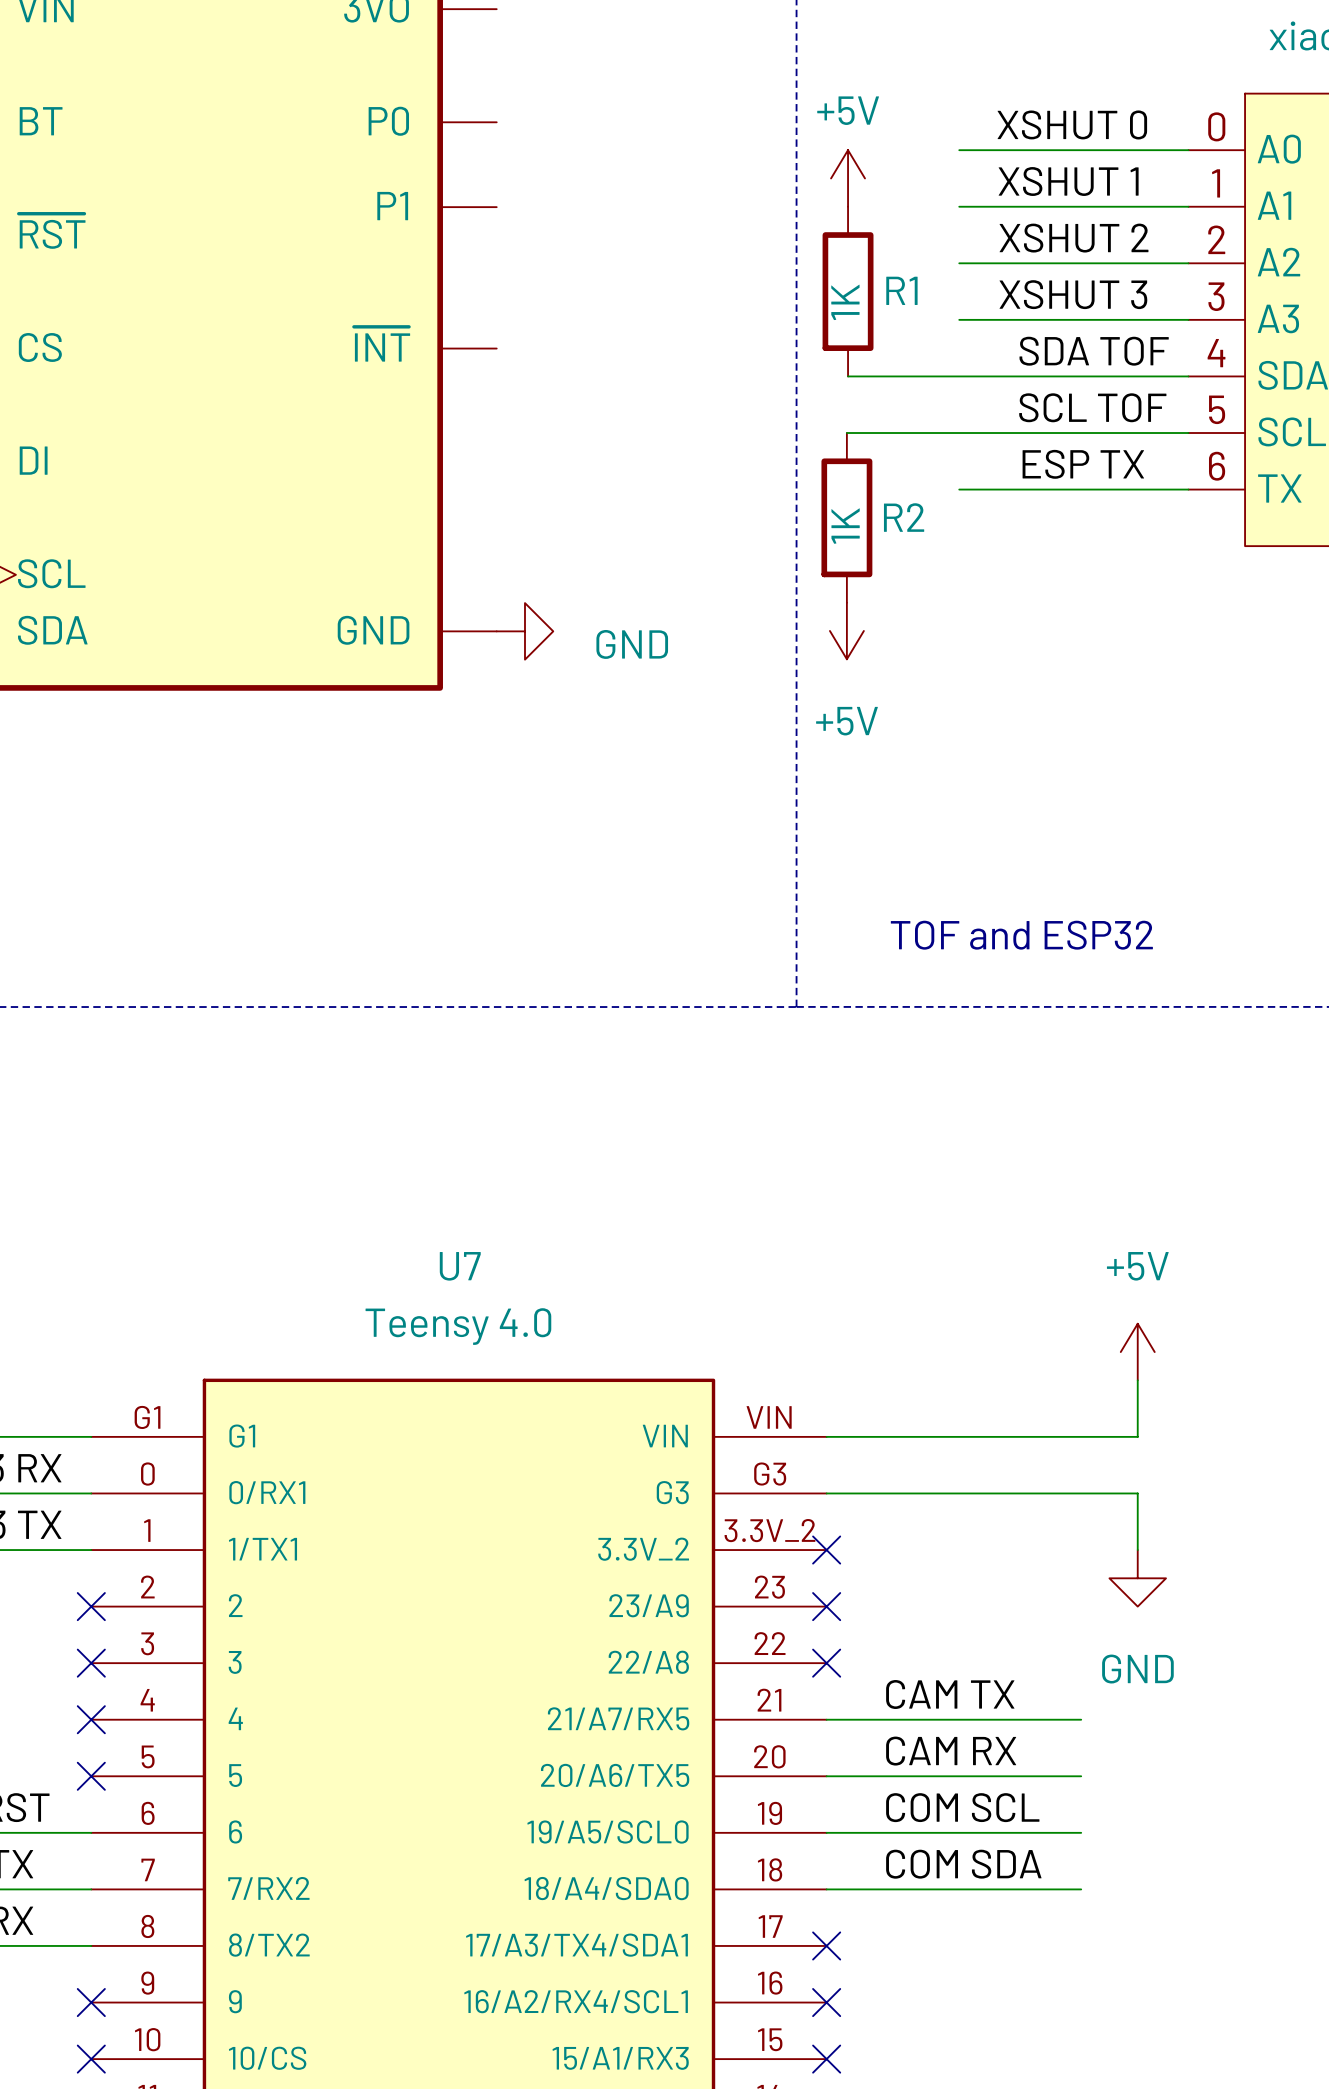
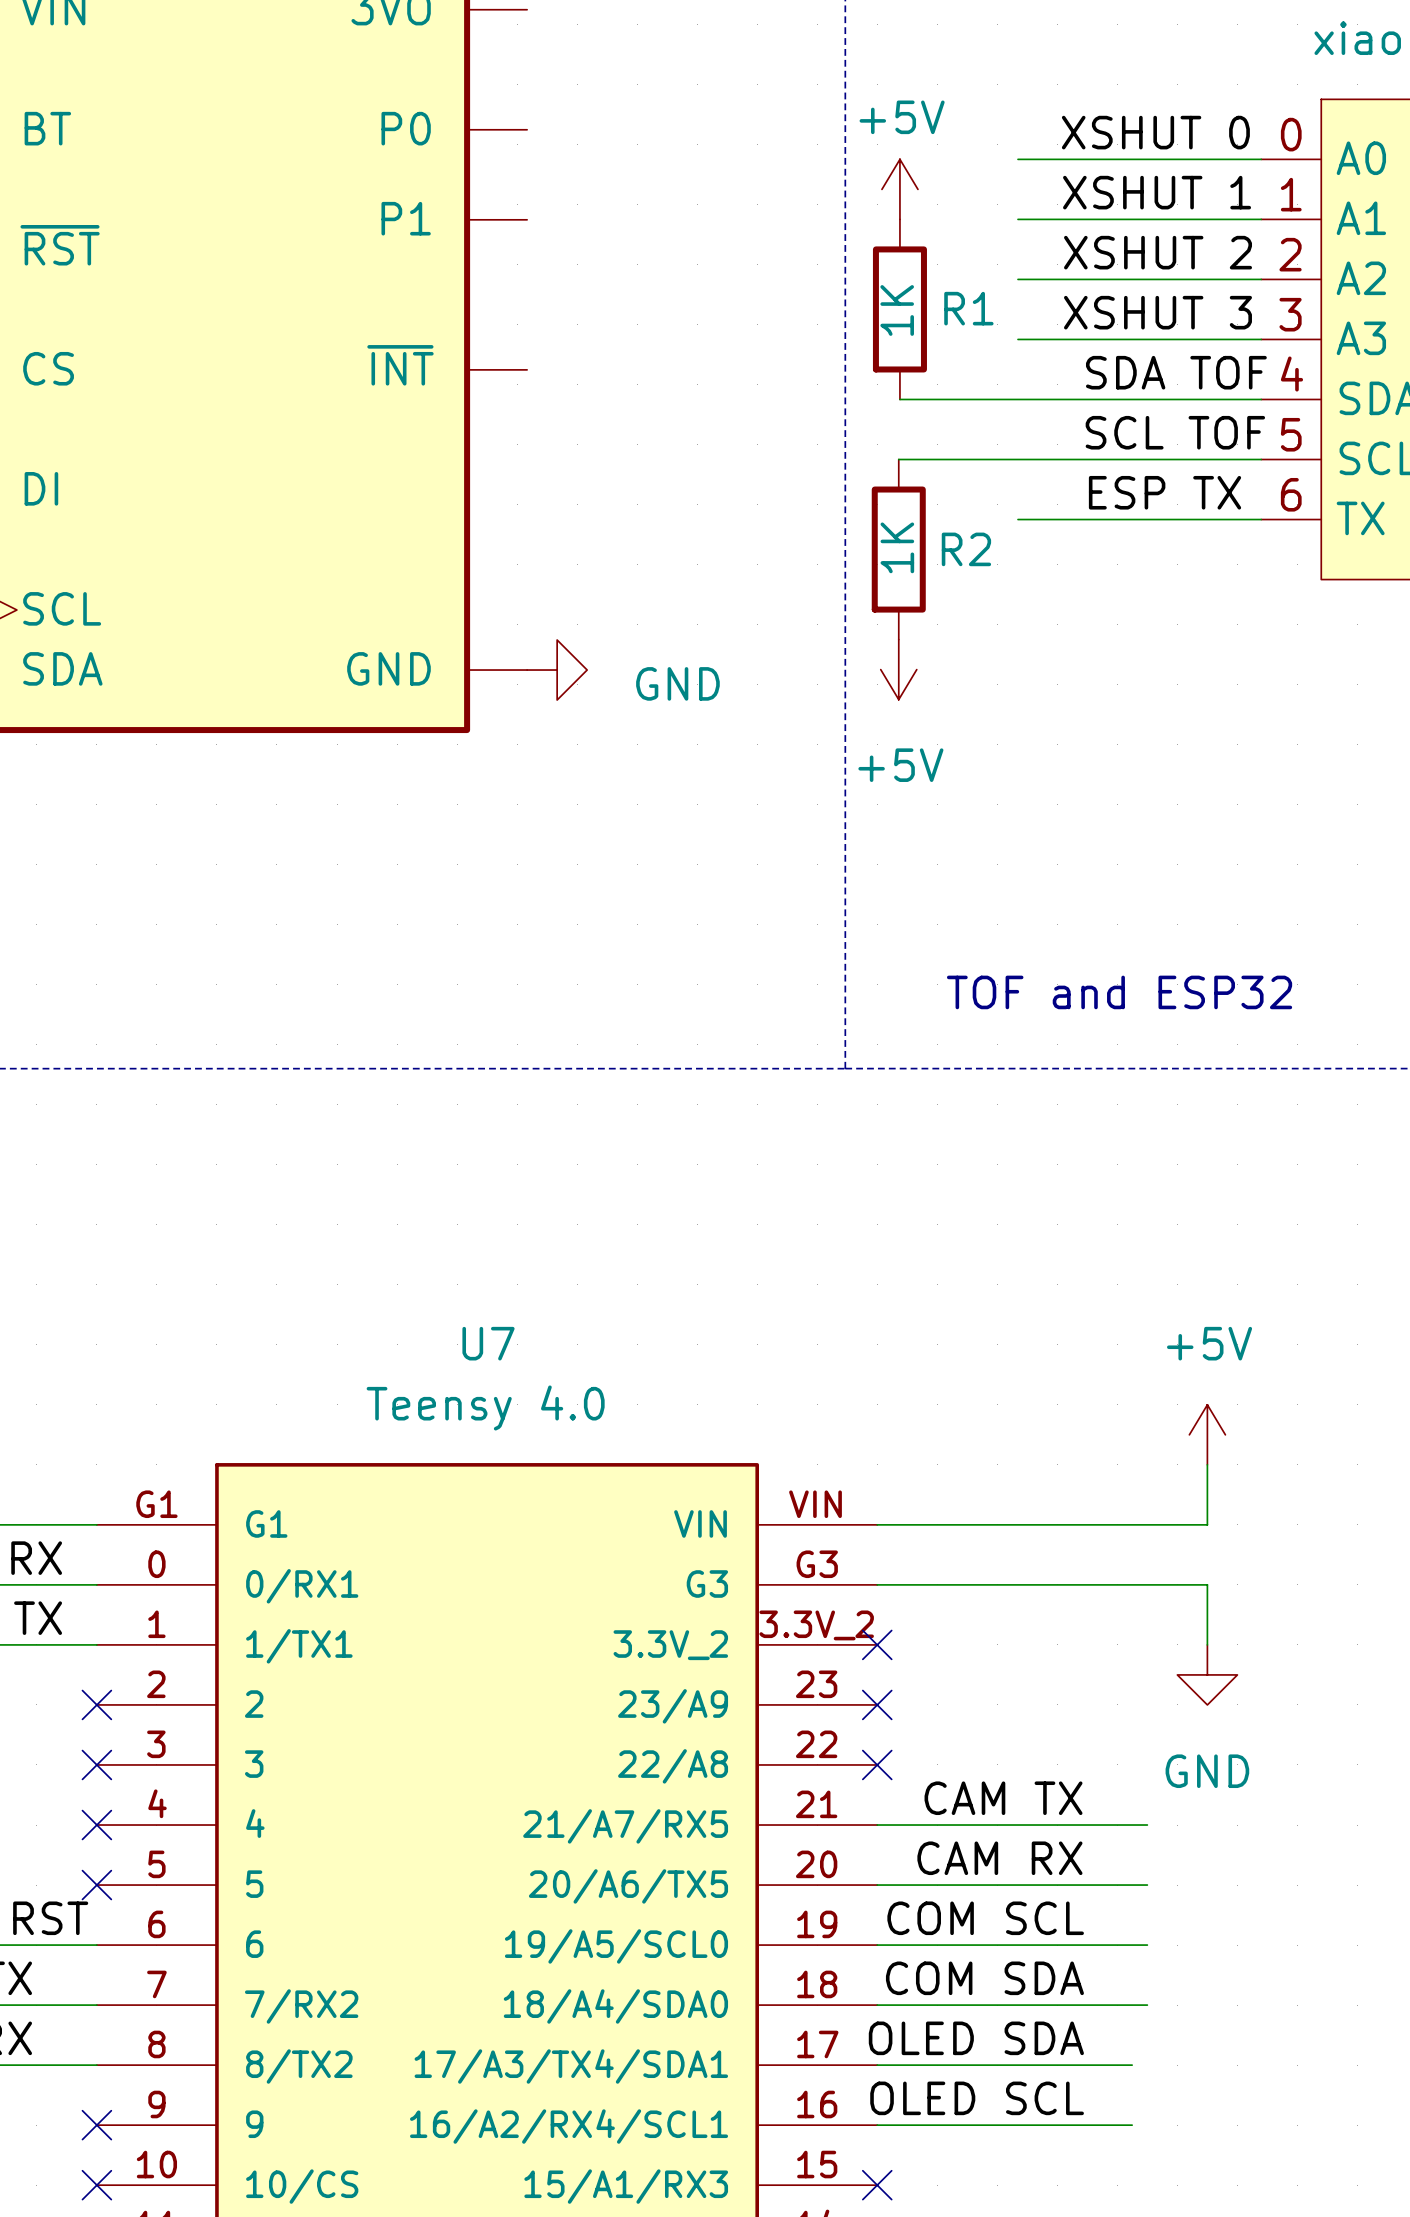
label position: CAM TX (950, 1694) -> CAM TX (1003, 1798)
label position: CAM RX (951, 1751) -> CAM RX (999, 1858)
label position: COM SCL (962, 1807) -> COM SCL (985, 1918)
label position: COM SDA (963, 1864) -> COM SDA (984, 1978)
label: none -> OLED SDA (976, 2038)
wire: none -> (877, 2065) (1132, 2065)
no-connect mark: (826, 1945) -> none
label: none -> OLED SCL (977, 2098)
wire: none -> (877, 2125) (1132, 2125)
no-connect mark: (826, 2002) -> none

